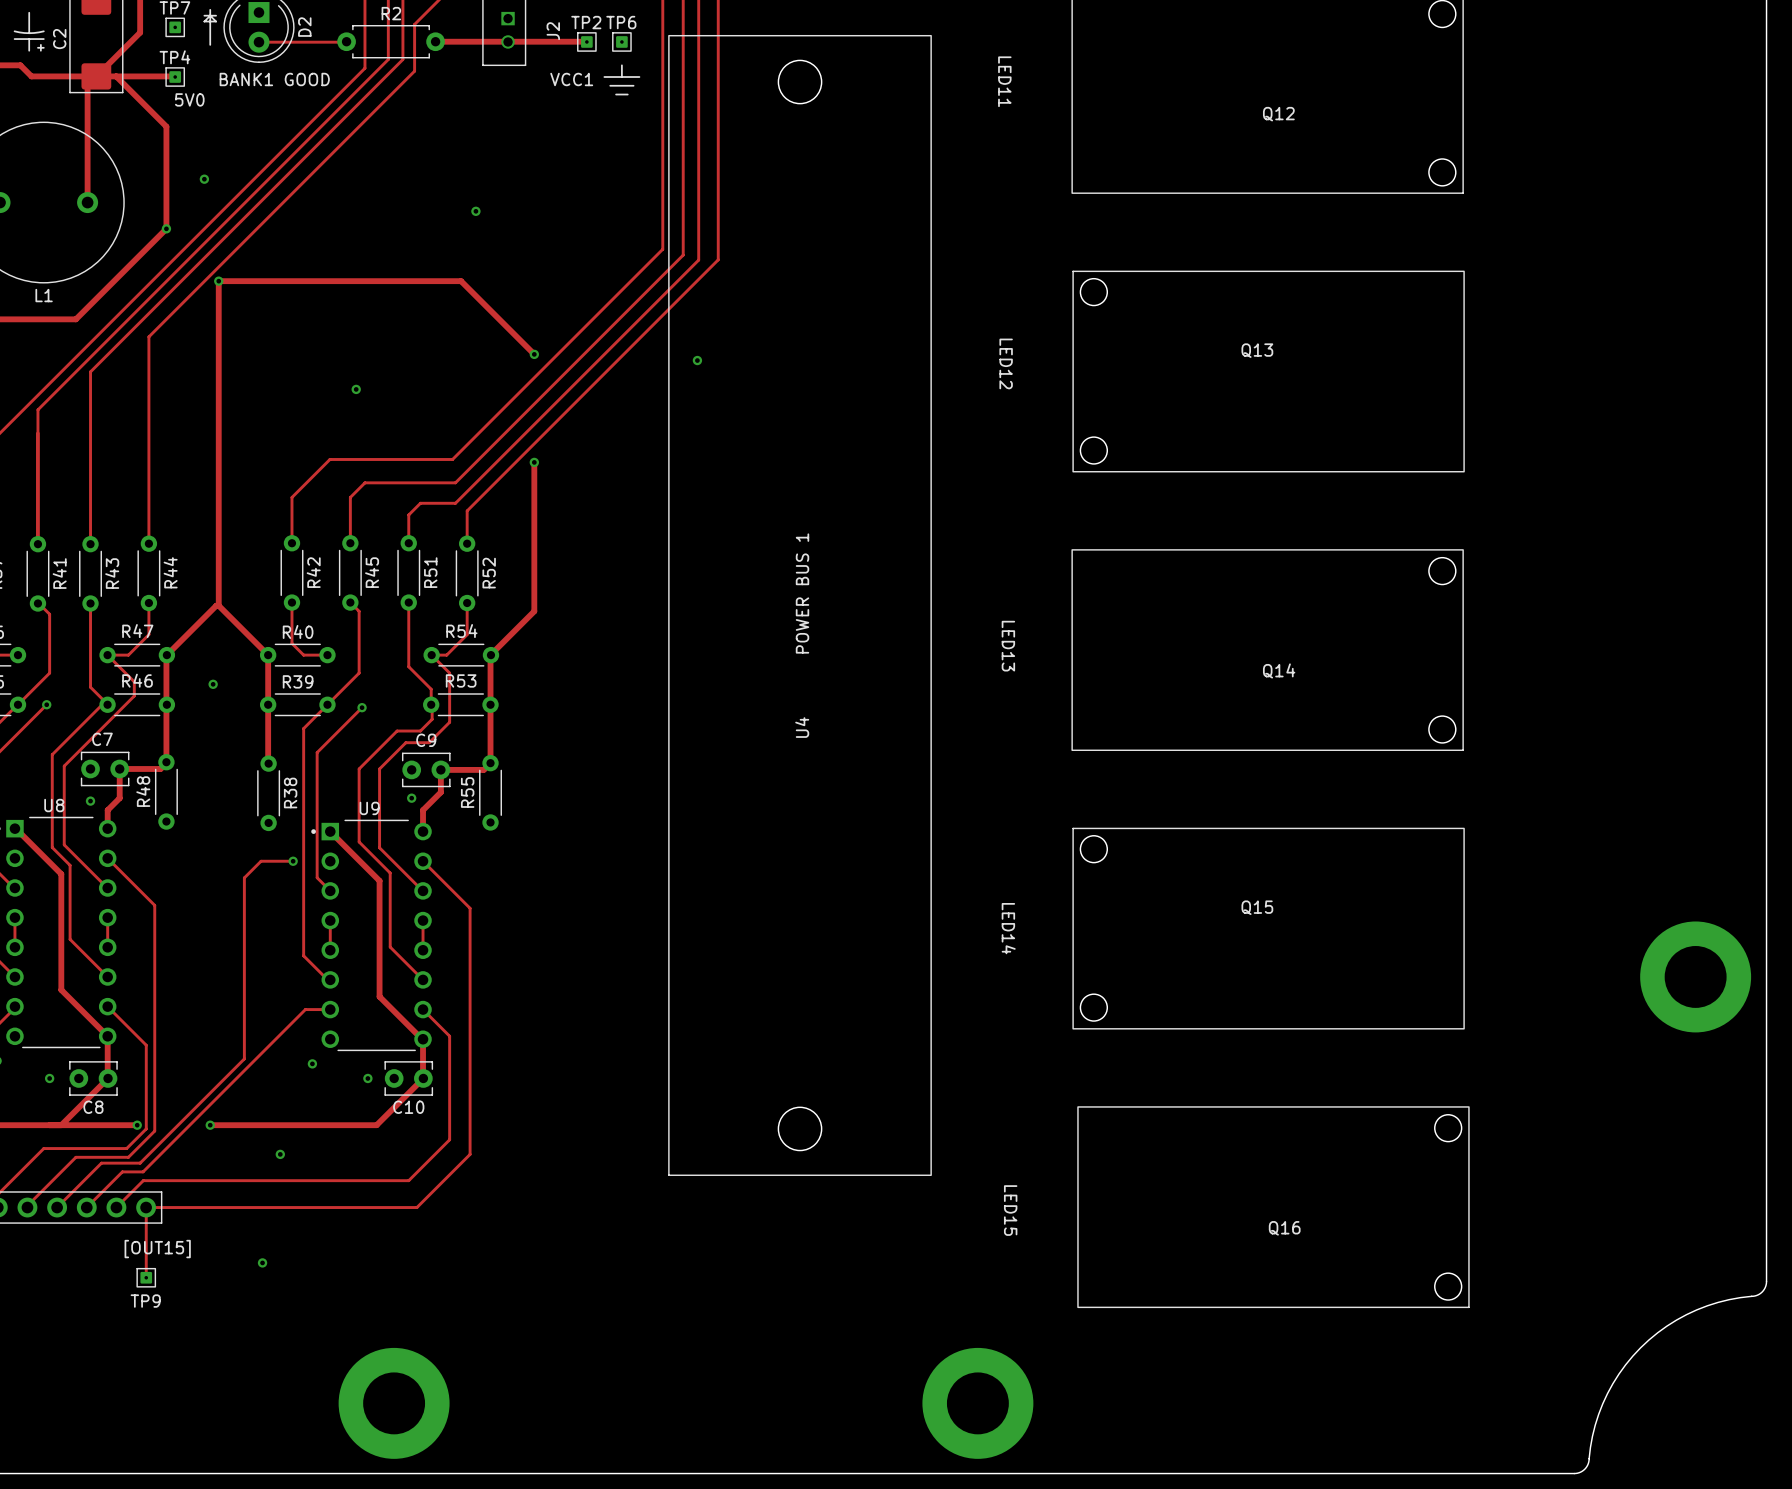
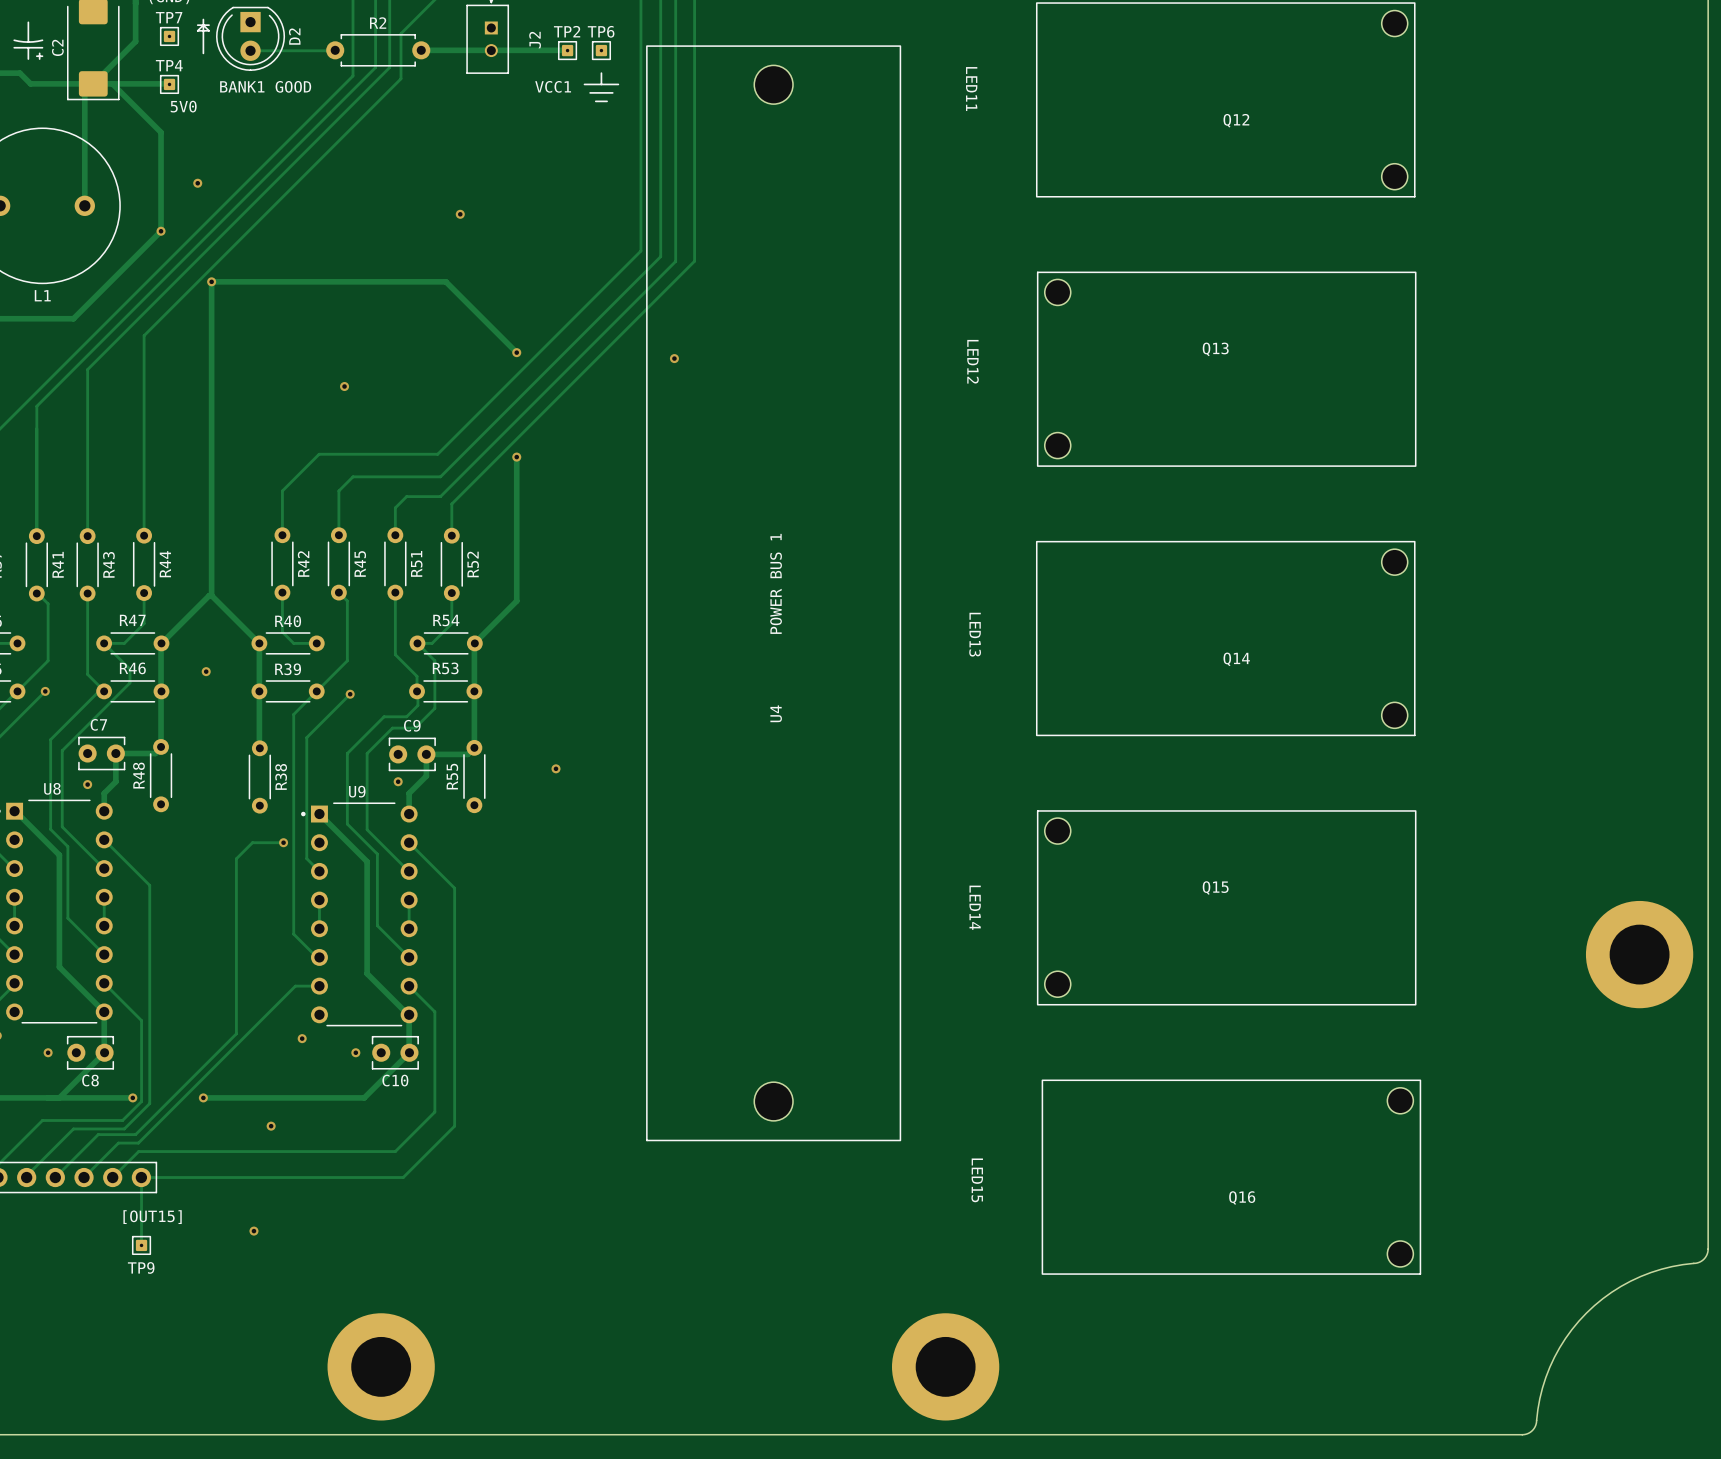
U4 footprint: [668, 34, 932, 1176] -> [646, 45, 902, 1142]
via: none -> (556, 768)

